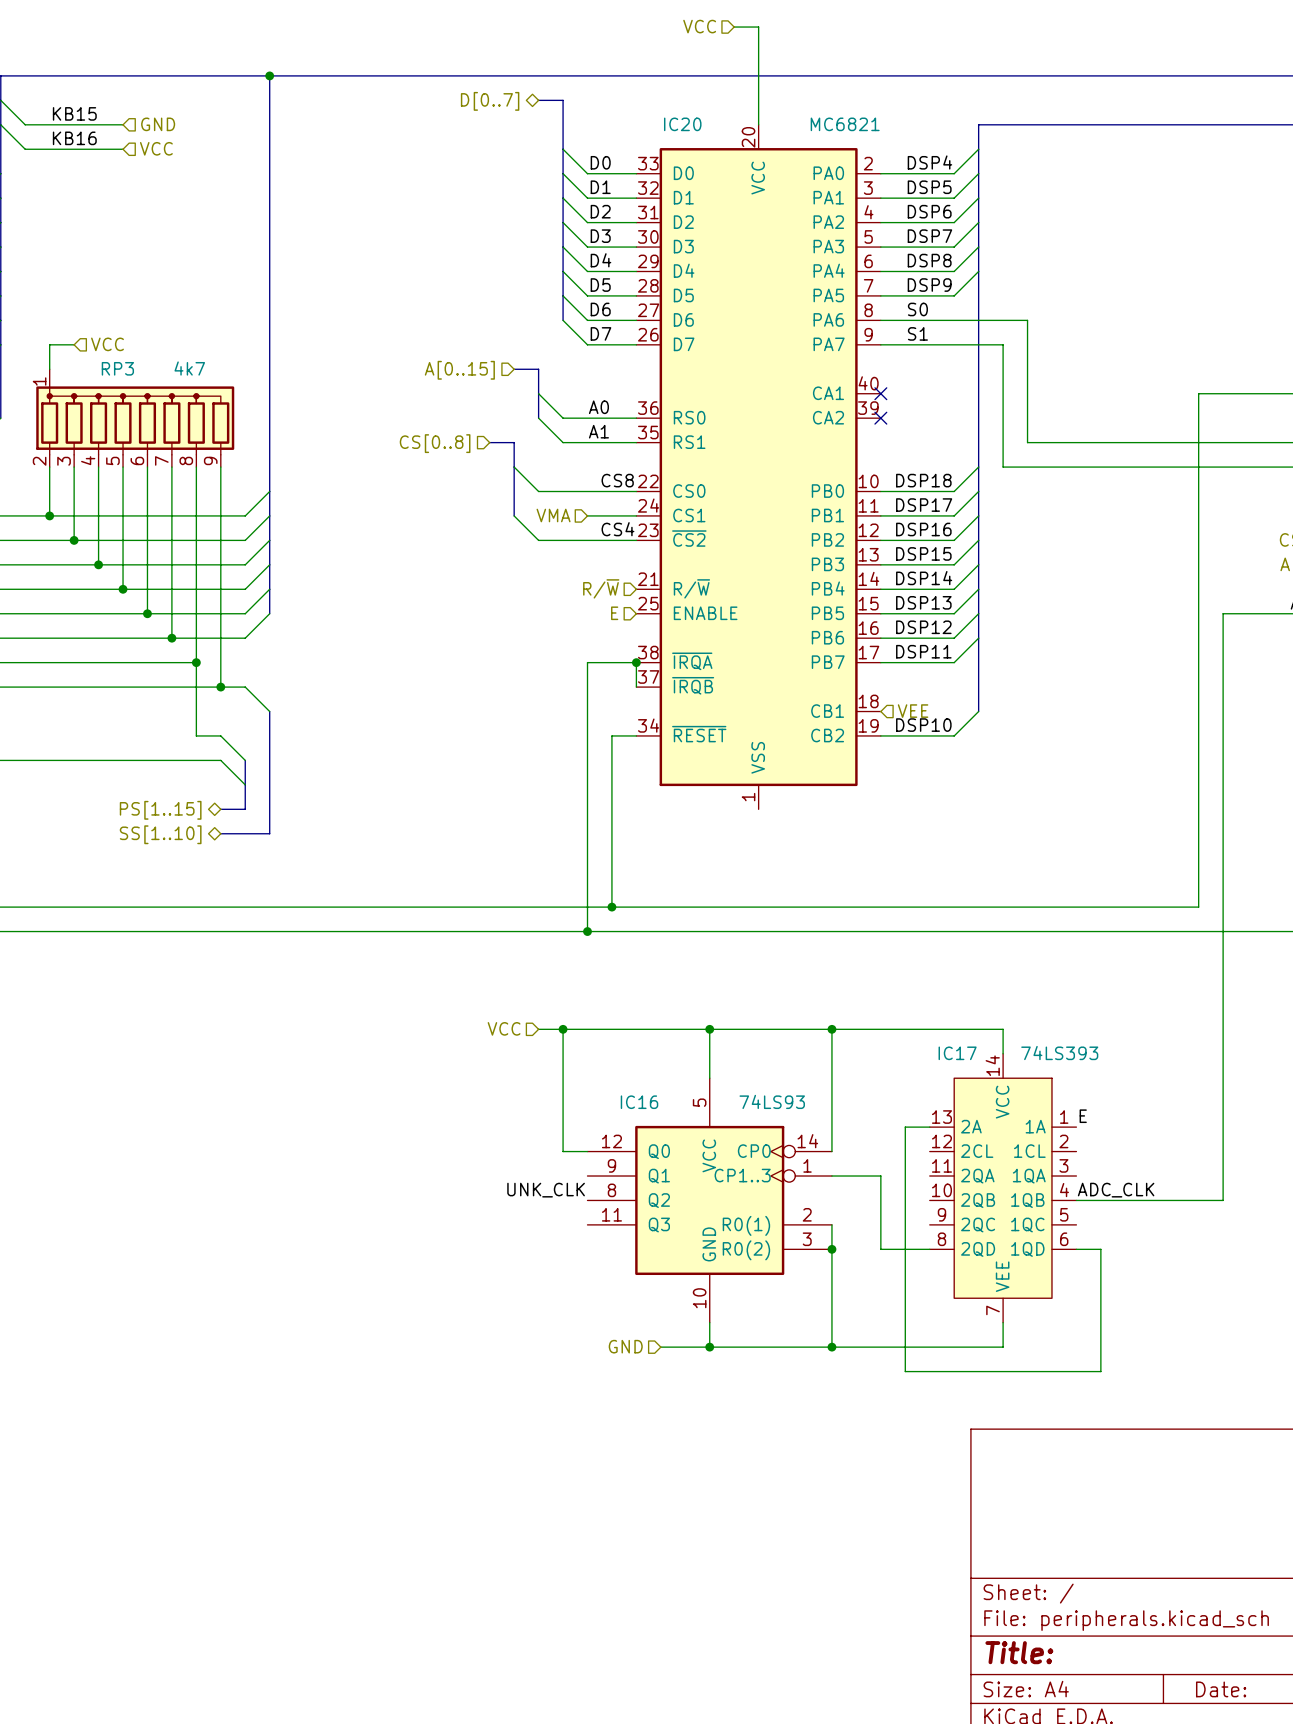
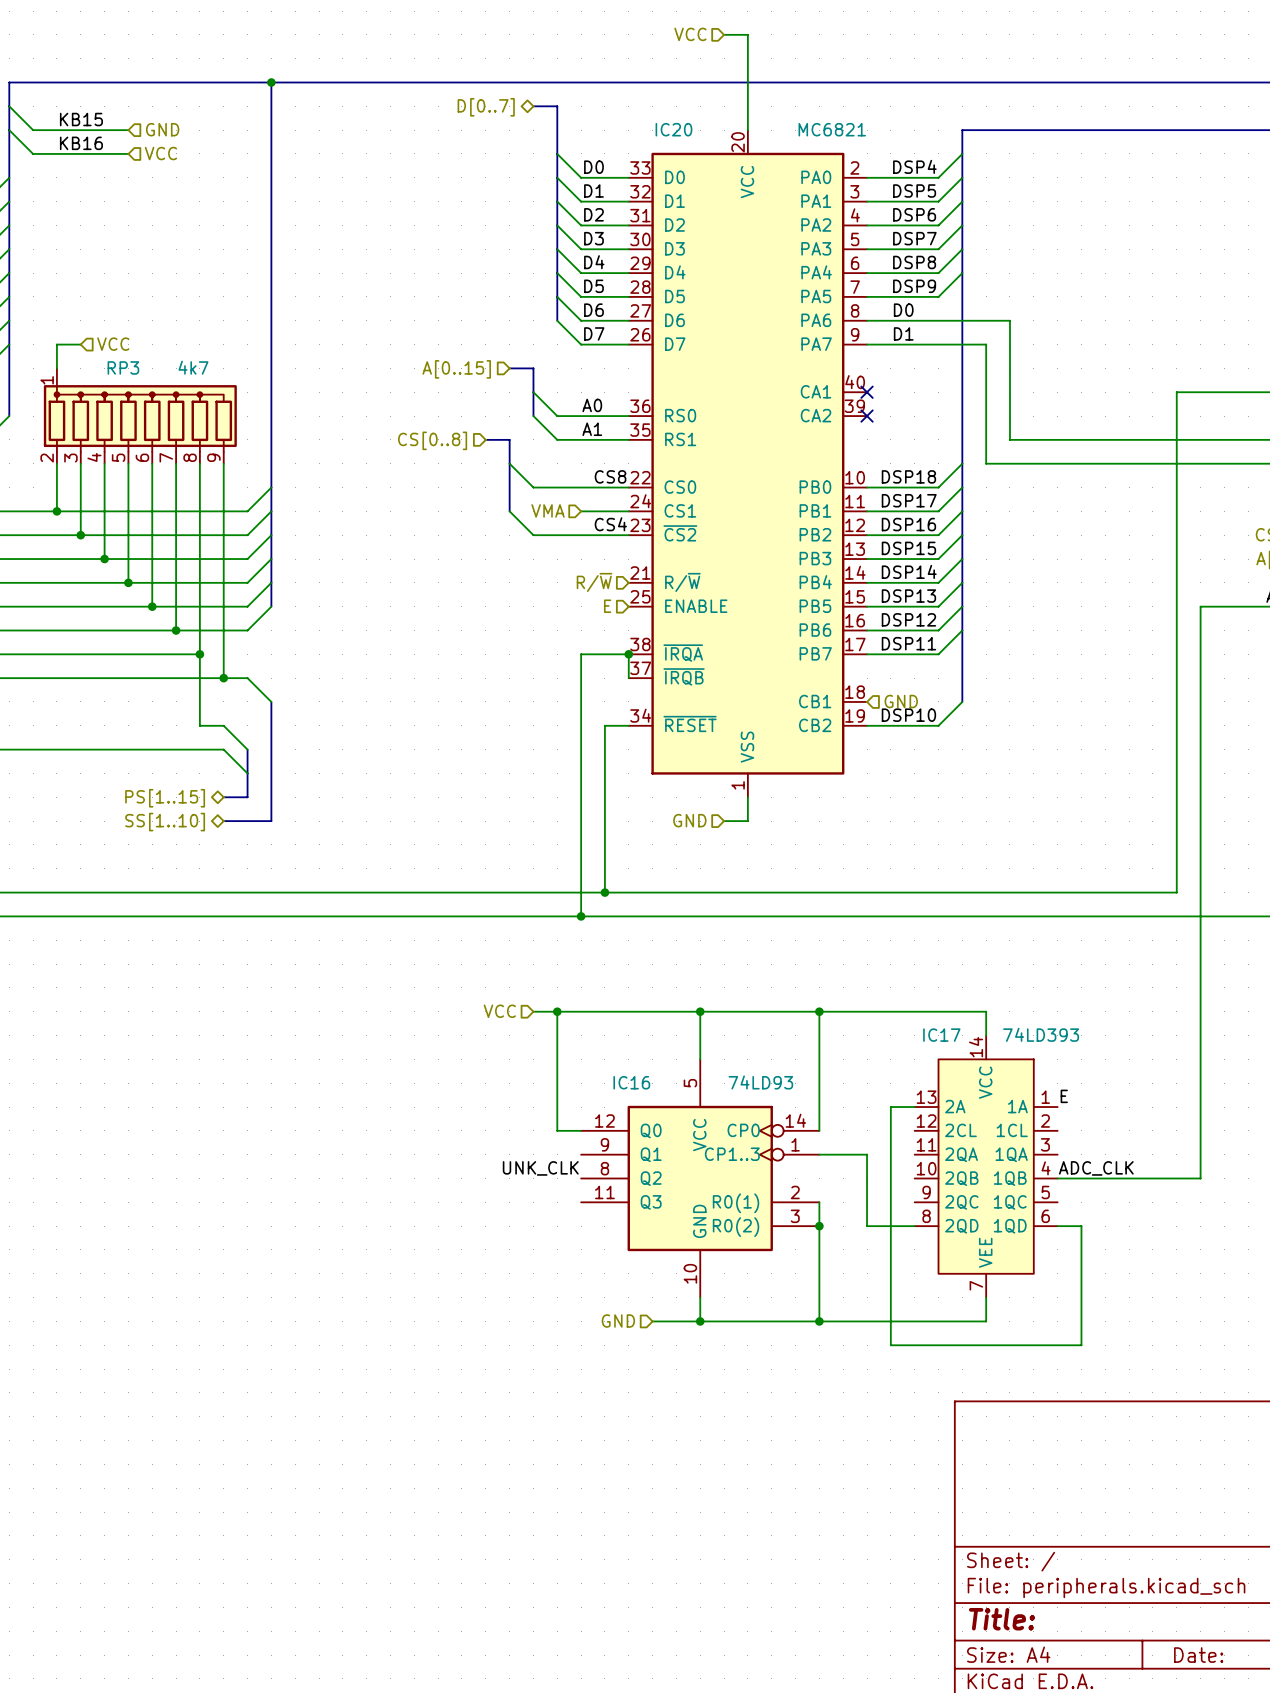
label: S0 (917, 309) -> D0 (903, 310)
label: S1 (917, 333) -> D1 (903, 333)
hierarchical label: VEE (913, 711) -> GND (901, 701)
wire: none -> (747, 797) (747, 821) (724, 821)
hierarchical label: none -> GND (689, 820)
IC17 value: 74LS393 (1059, 1053) -> 74LD393 (1041, 1034)
IC16 value: 74LS93 (772, 1101) -> 74LD93 (760, 1082)

